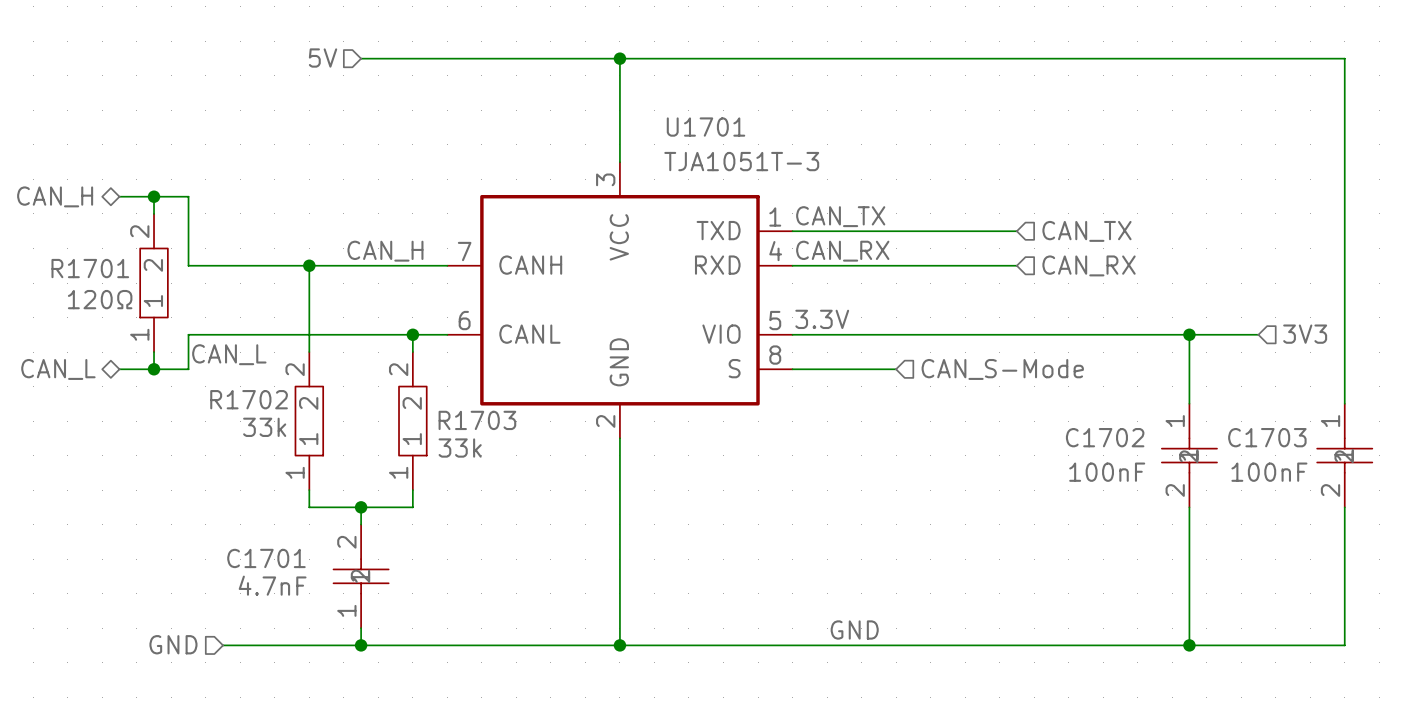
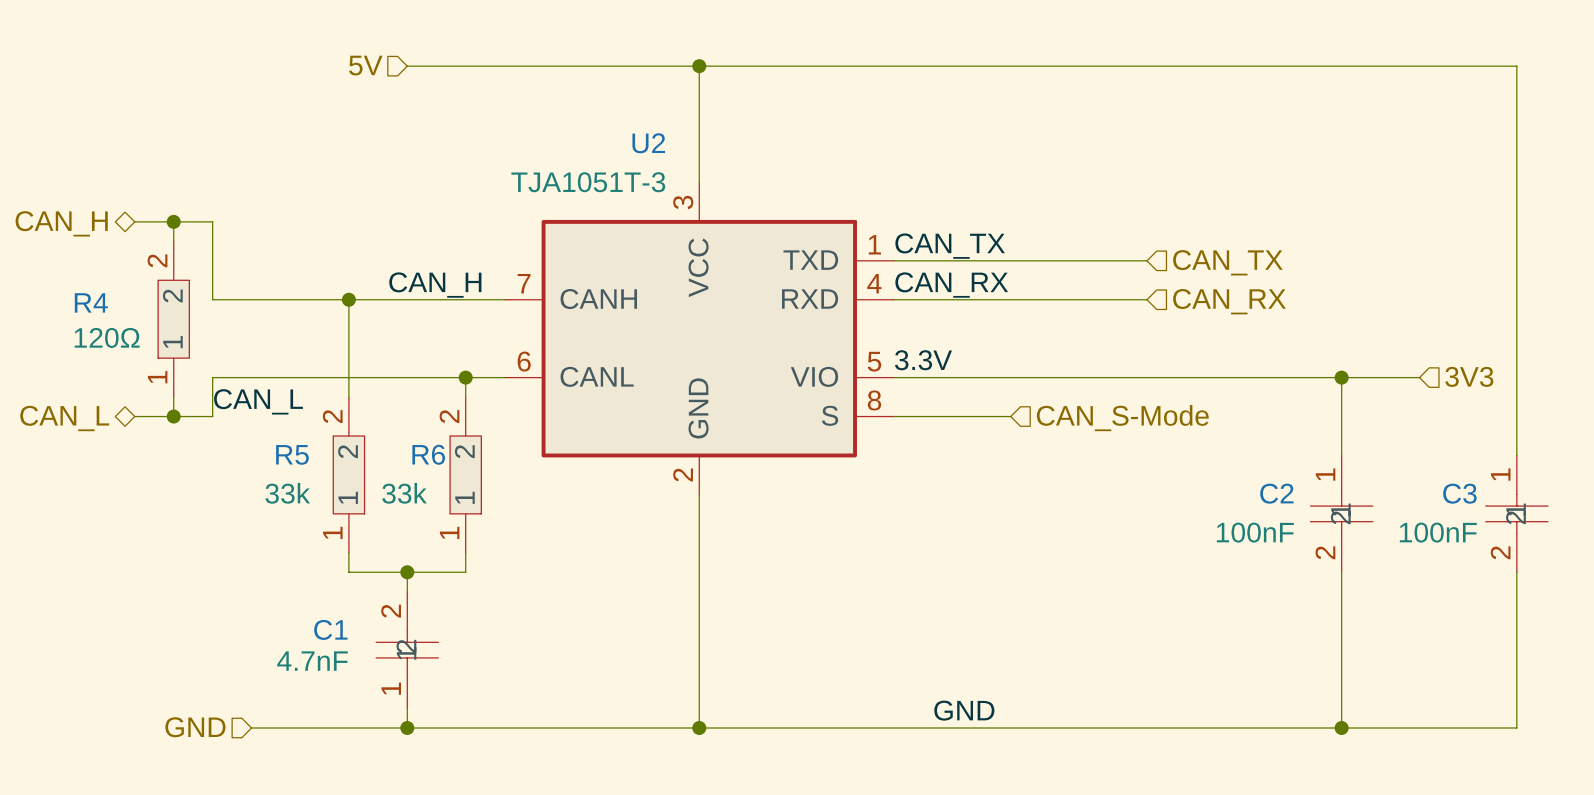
U1701 name: U1701 (706, 127) -> U2 (648, 143)
U1701 value position: TJA1051T-3 (741, 161) -> TJA1051T-3 (588, 182)
R1701 name: R1701 (90, 268) -> R4 (91, 302)
R1702 name: R1702 (249, 399) -> R5 (292, 454)
R1703 name: R1703 (477, 420) -> R6 (428, 454)
R1702 value position: 33k (264, 427) -> 33k (287, 493)
C1702 name: C1702 (1105, 437) -> C2 (1276, 493)
C1703 name: C1703 (1267, 437) -> C3 (1459, 493)
R1703 value position: 33k (460, 448) -> 33k (404, 493)
C1701 name: C1701 (266, 558) -> C1 (330, 629)

